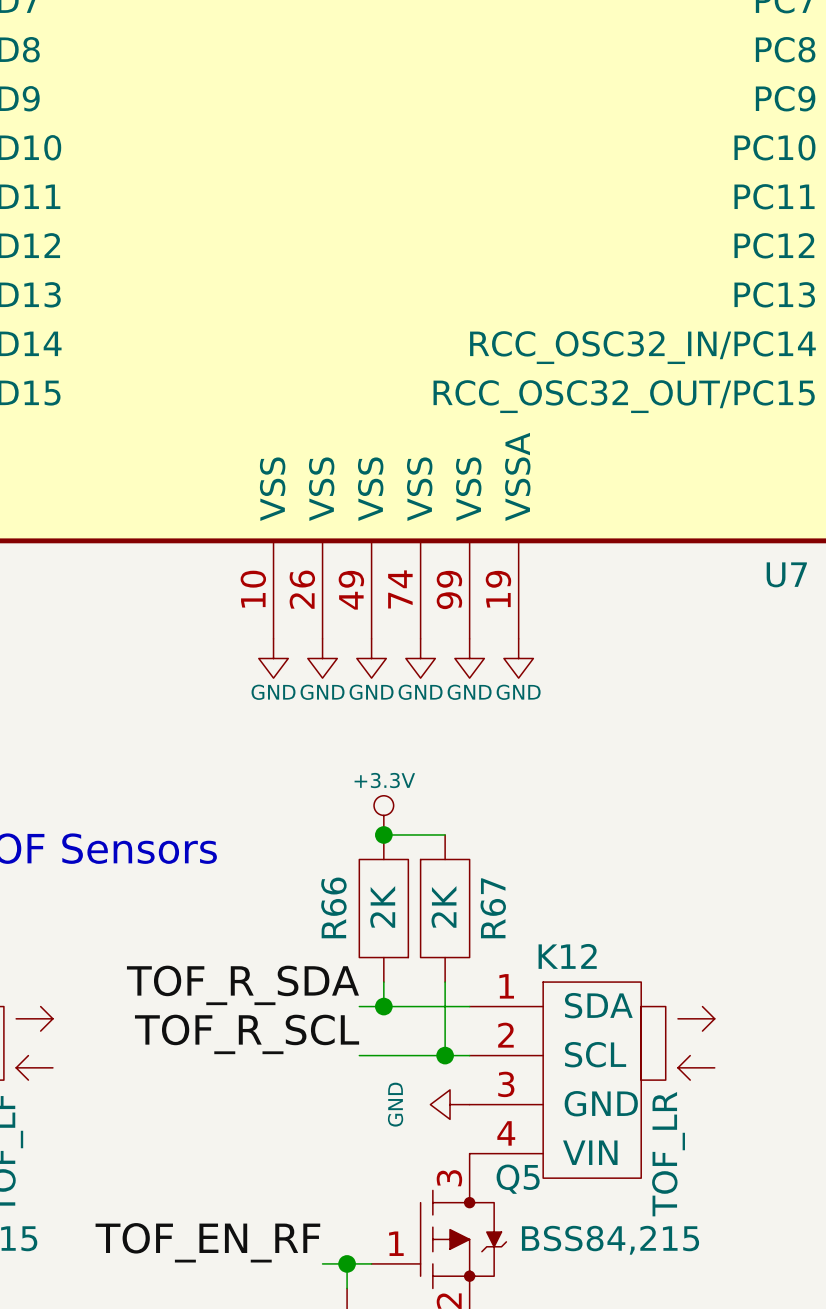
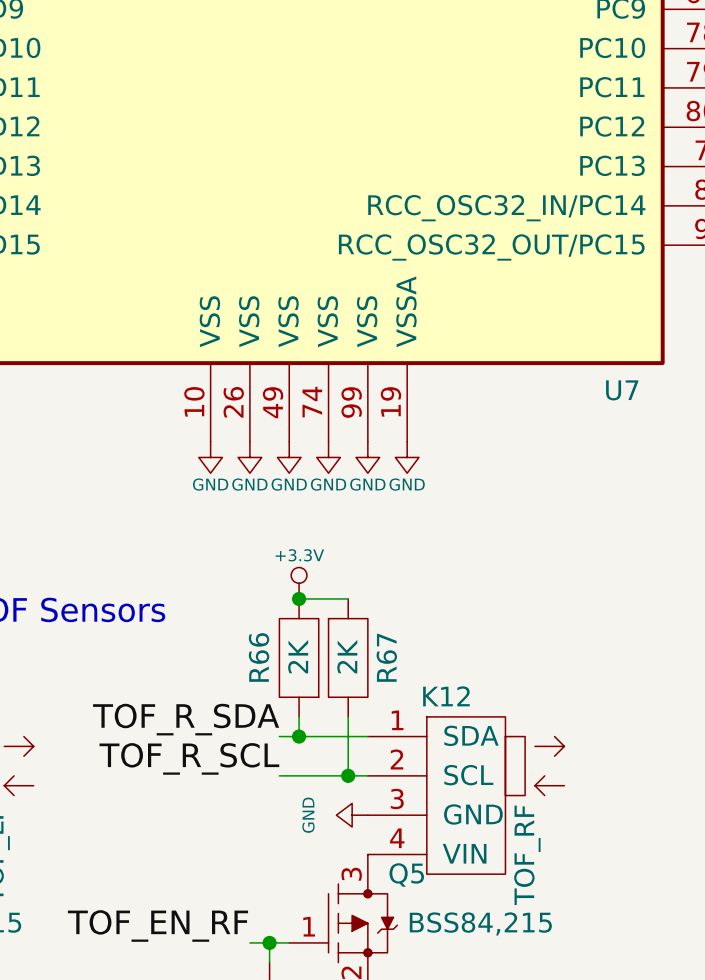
K12 value: TOF_LR (668, 1154) -> TOF_RF (527, 855)

